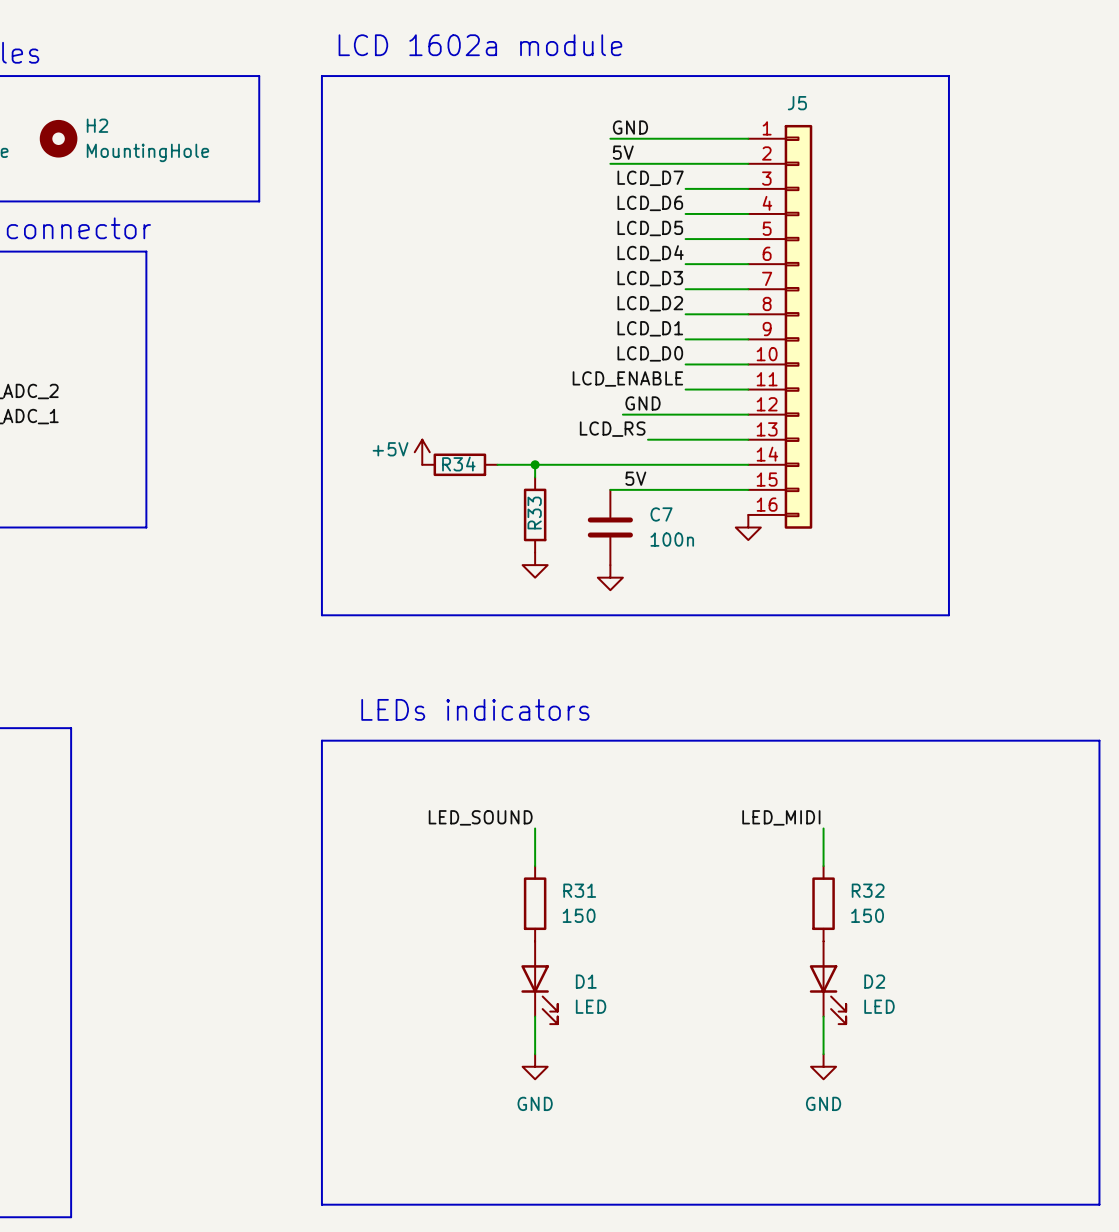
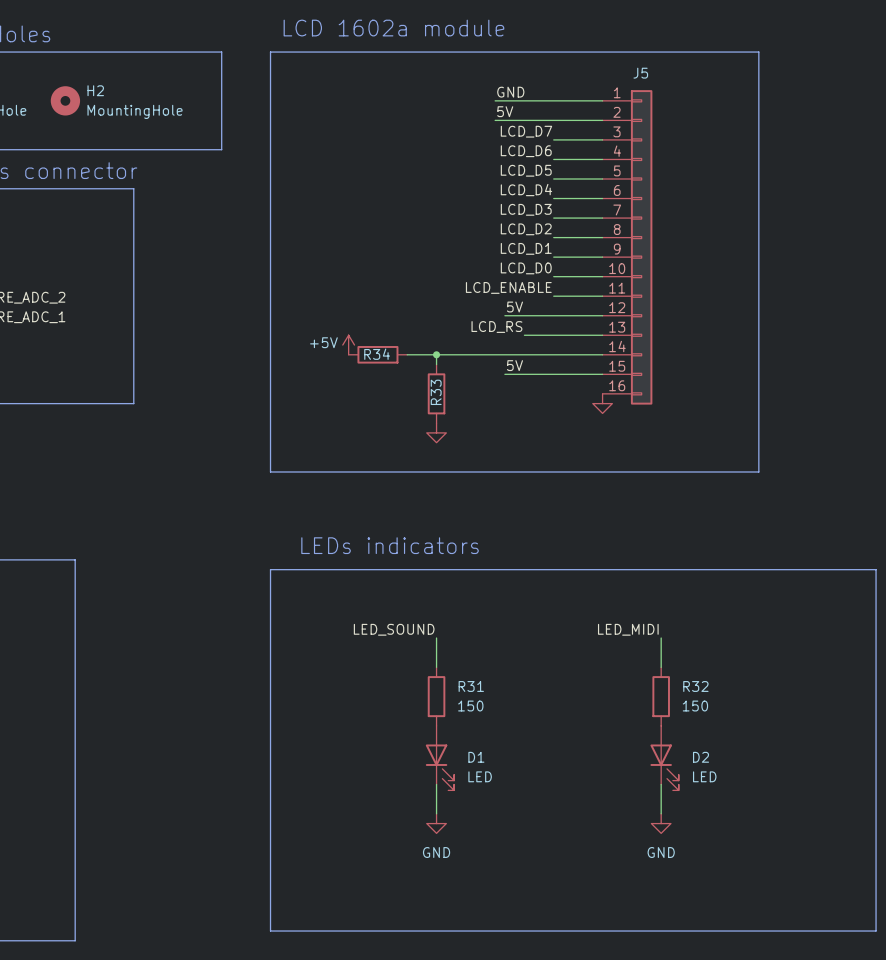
label: GND (643, 403) -> 5V (514, 307)
wire: (610, 489) (622, 489) -> none
C7: 100n (610, 527) -> none
power symbol: (610, 577) -> none

